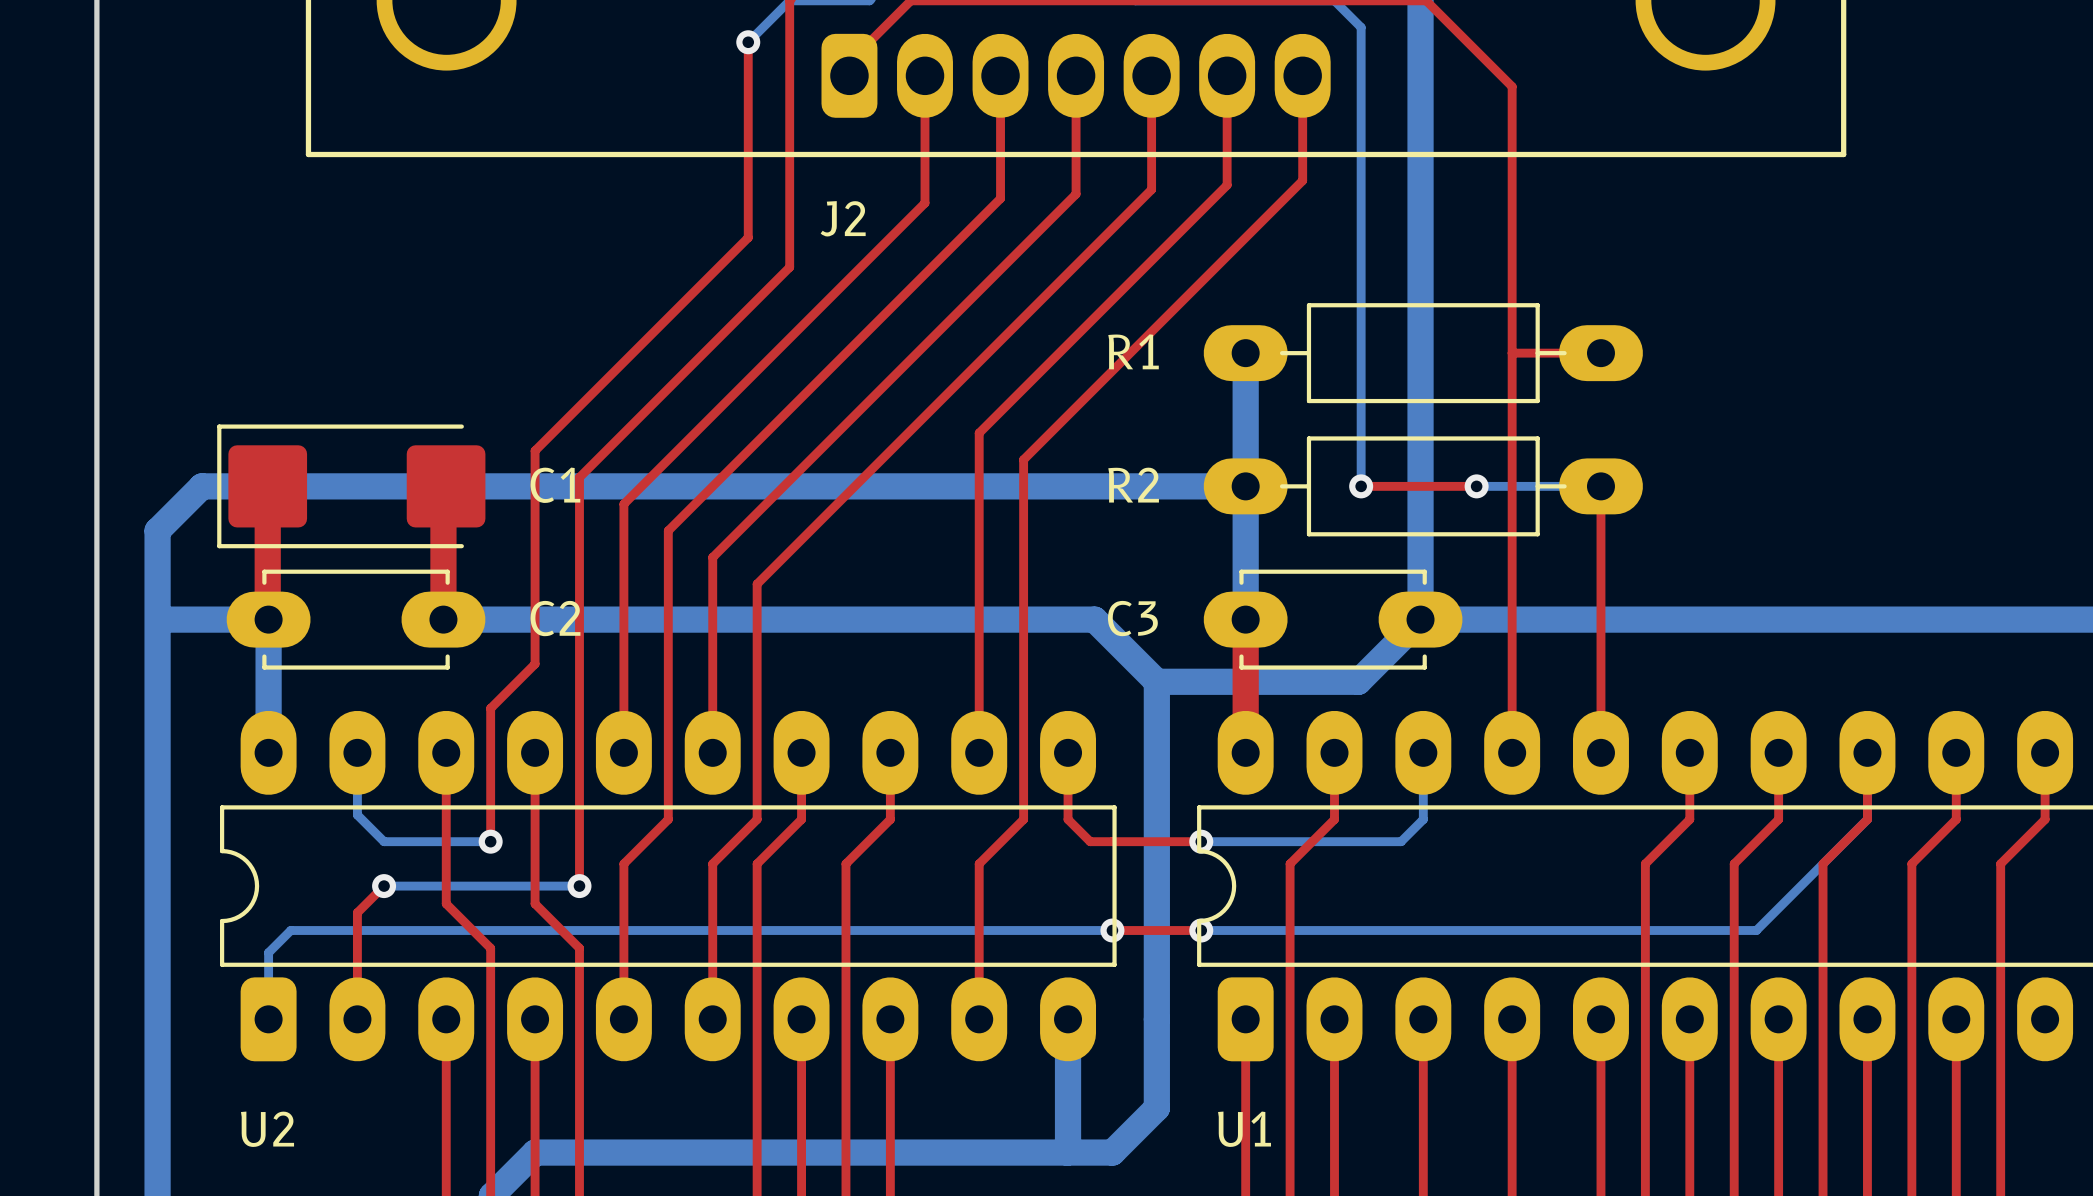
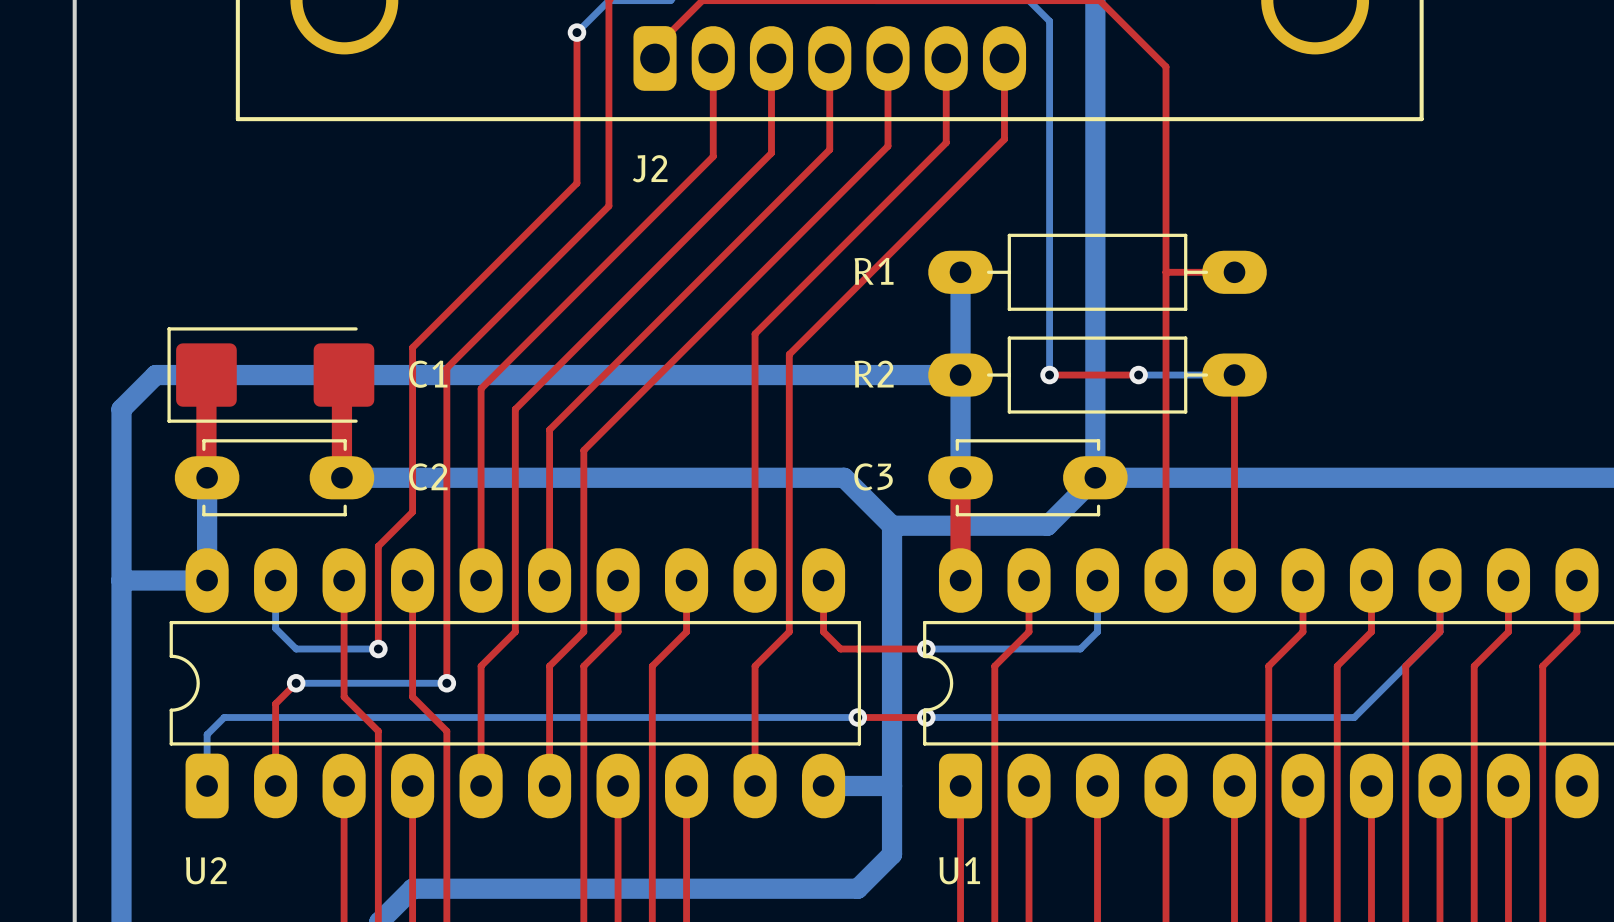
bottom track: (166, 619) (268, 619) -> none
bottom track: none -> (121, 580) (207, 580)
bottom track: (1068, 1019) (1067, 1152) -> (823, 786) (892, 786)

